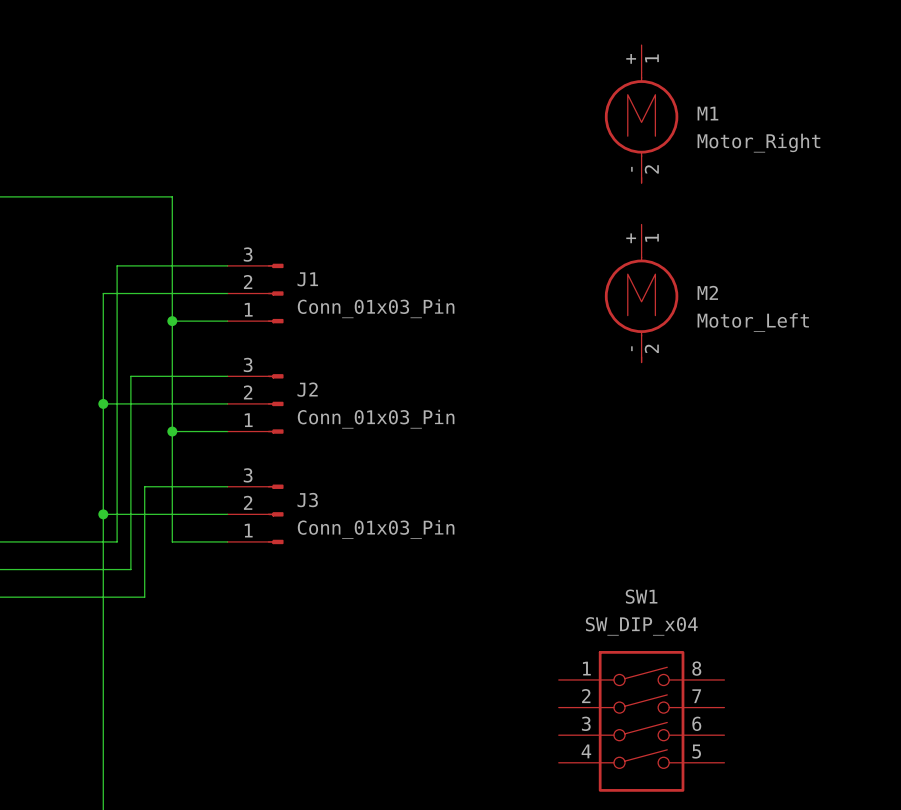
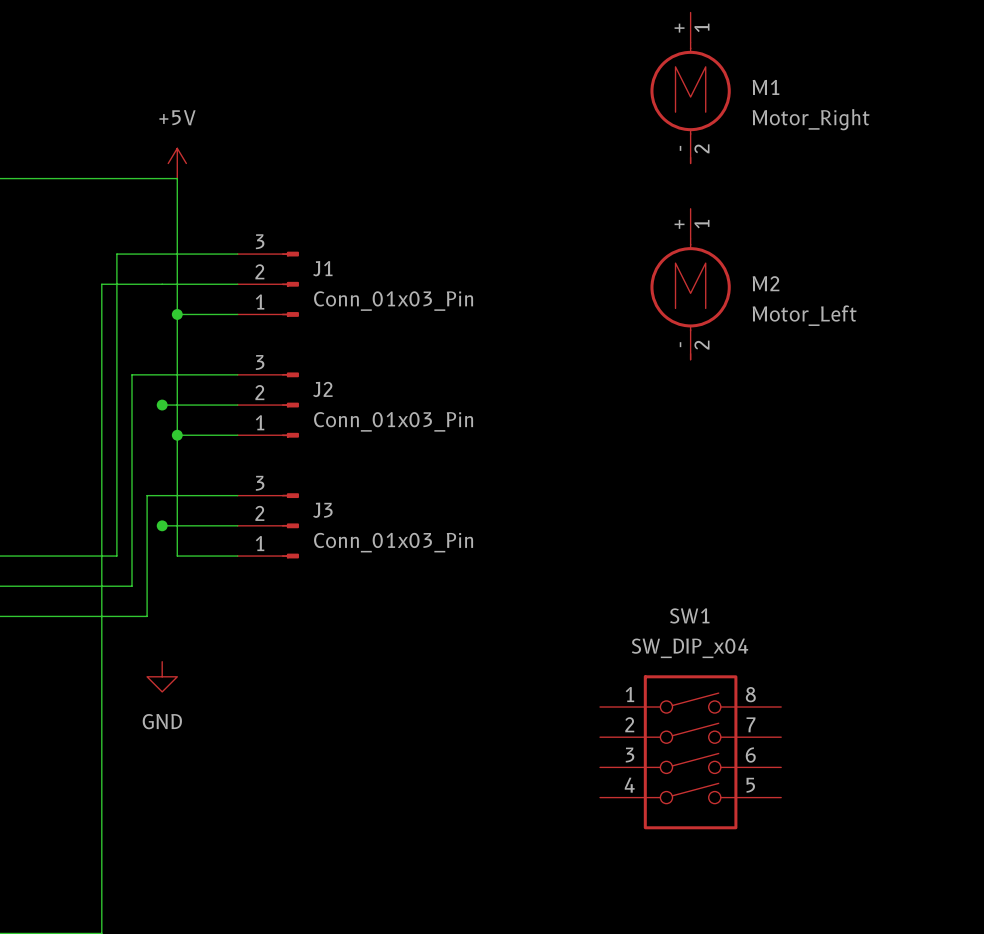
power symbol: none -> +5V (177, 163)
wire: (103, 403) (158, 403) -> none
junction position: (103, 403) -> (162, 405)
wire: (103, 514) (158, 514) -> none
junction position: (103, 514) -> (162, 525)
power symbol: none -> GND (162, 676)

